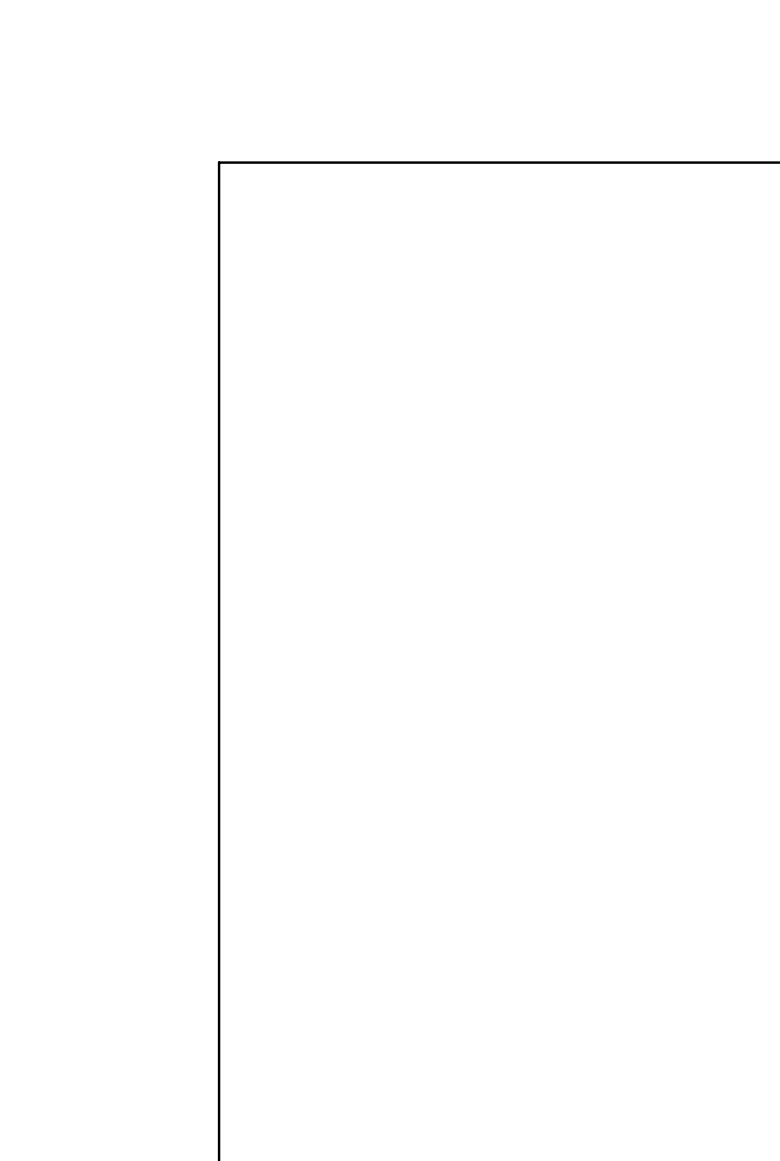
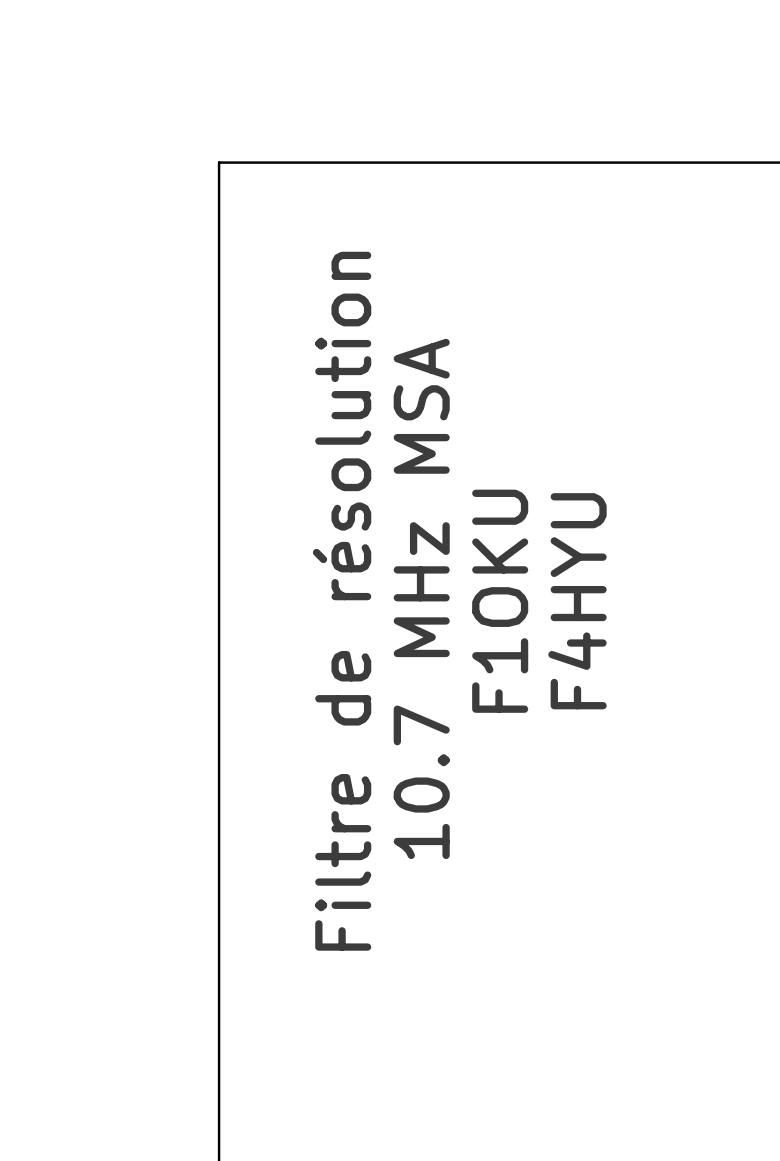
text: none -> 10.7 MHz MSA (421, 598)
text: none -> Filtre de résolution (342, 601)
text: none -> F1OKU (500, 601)
text: none -> F4HYU (577, 601)

